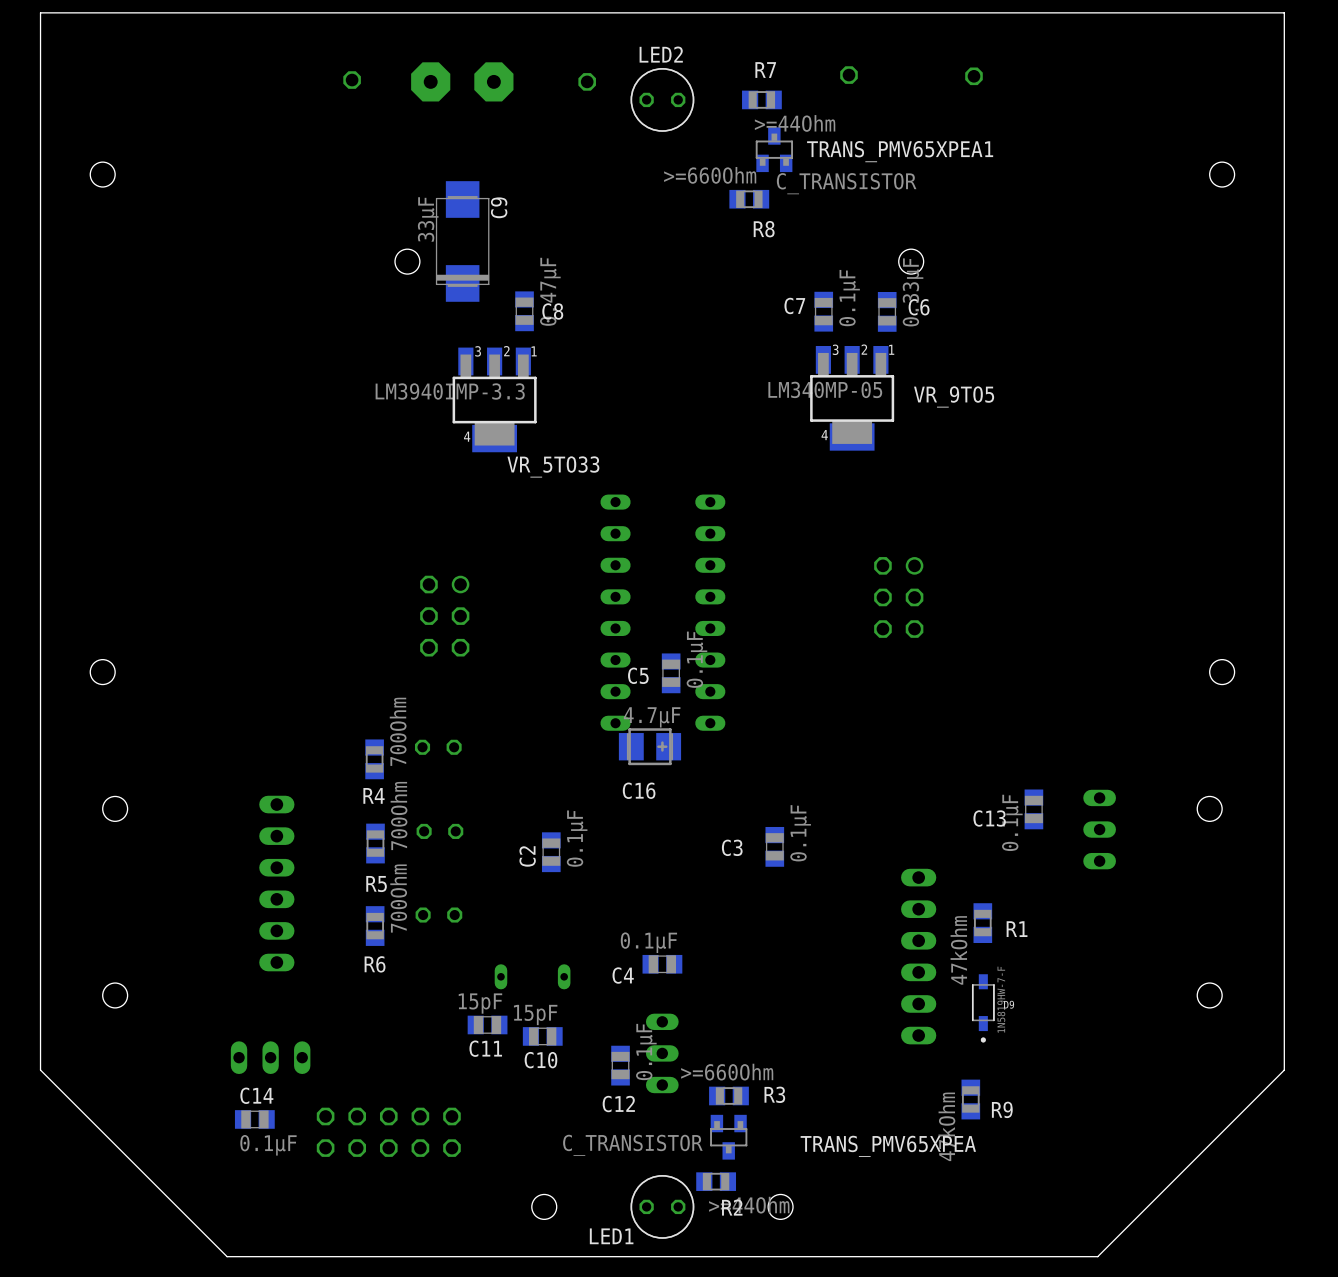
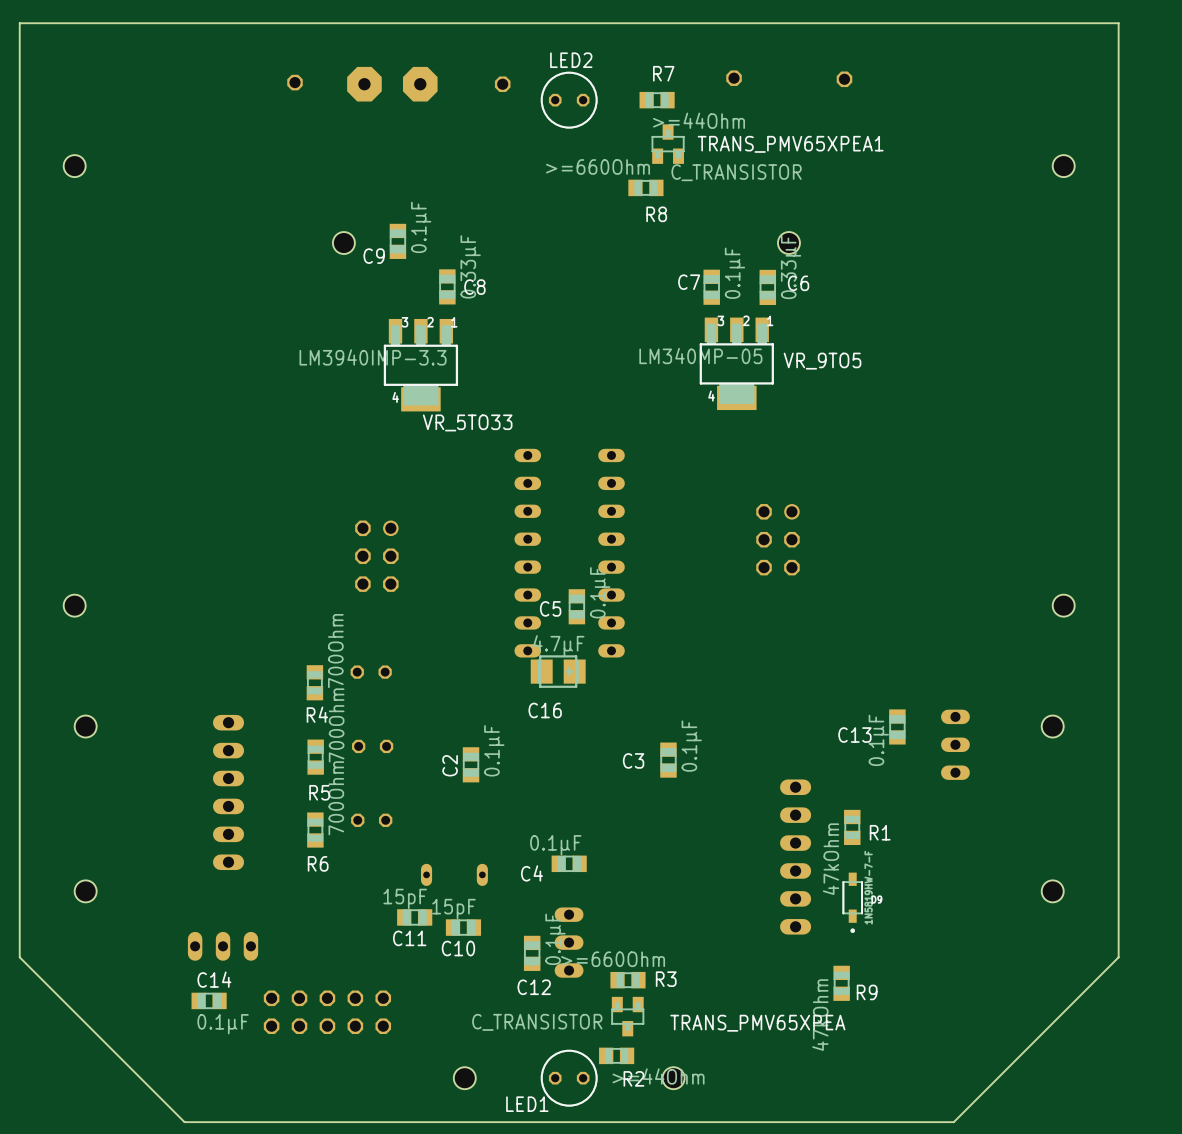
C9 footprint: [435, 181, 490, 302] -> [389, 223, 407, 259]
C9 name position: C9 (499, 207) -> C9 (374, 256)
C9 value: 33µF (428, 219) -> 0.1µF (421, 227)
C8 value: 0.47µF (550, 291) -> 0.33µF (470, 266)

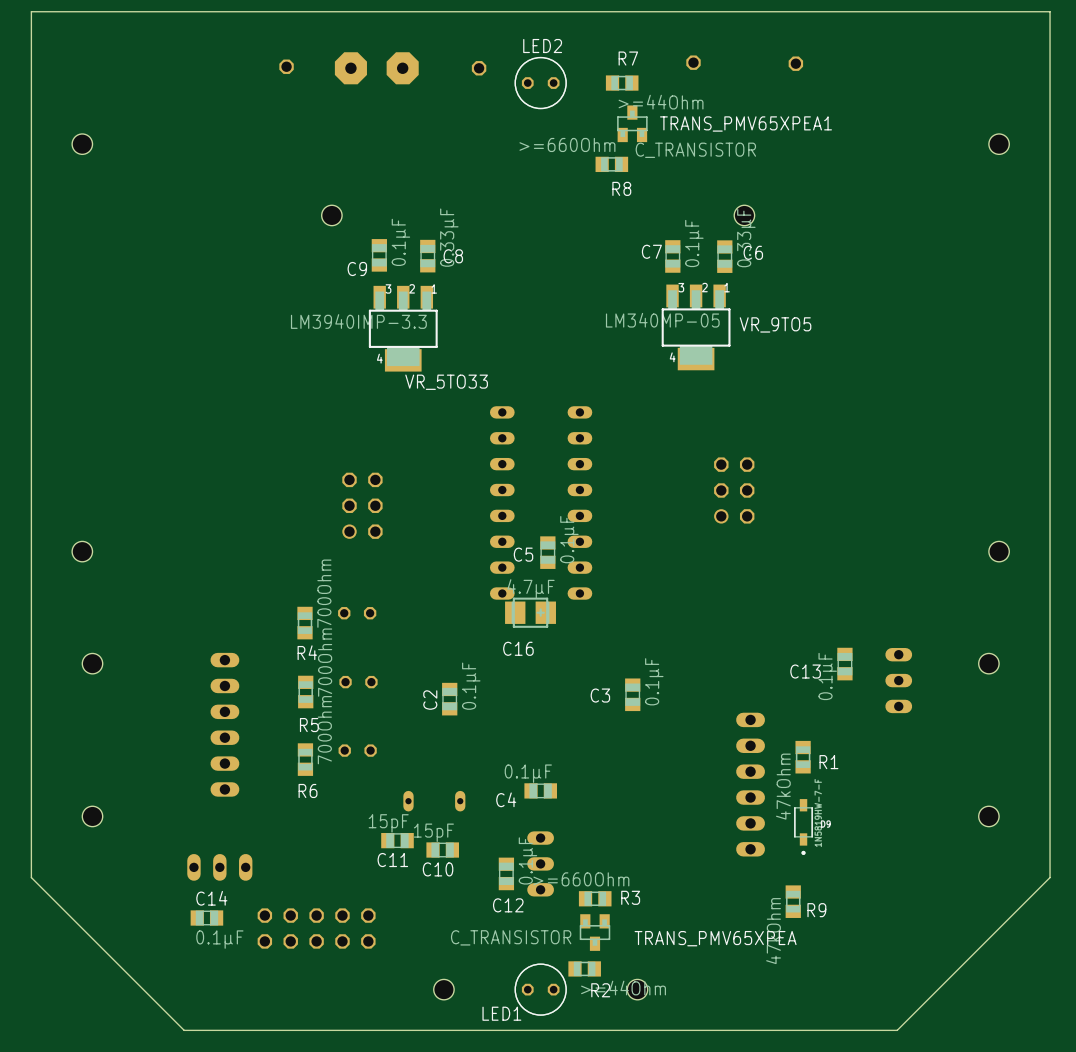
C9 position: (397, 241) -> (379, 255)
part rotation: 0° (777, 539) -> 180° (734, 490)
part rotation: 0° (376, 556) -> 180° (362, 505)

